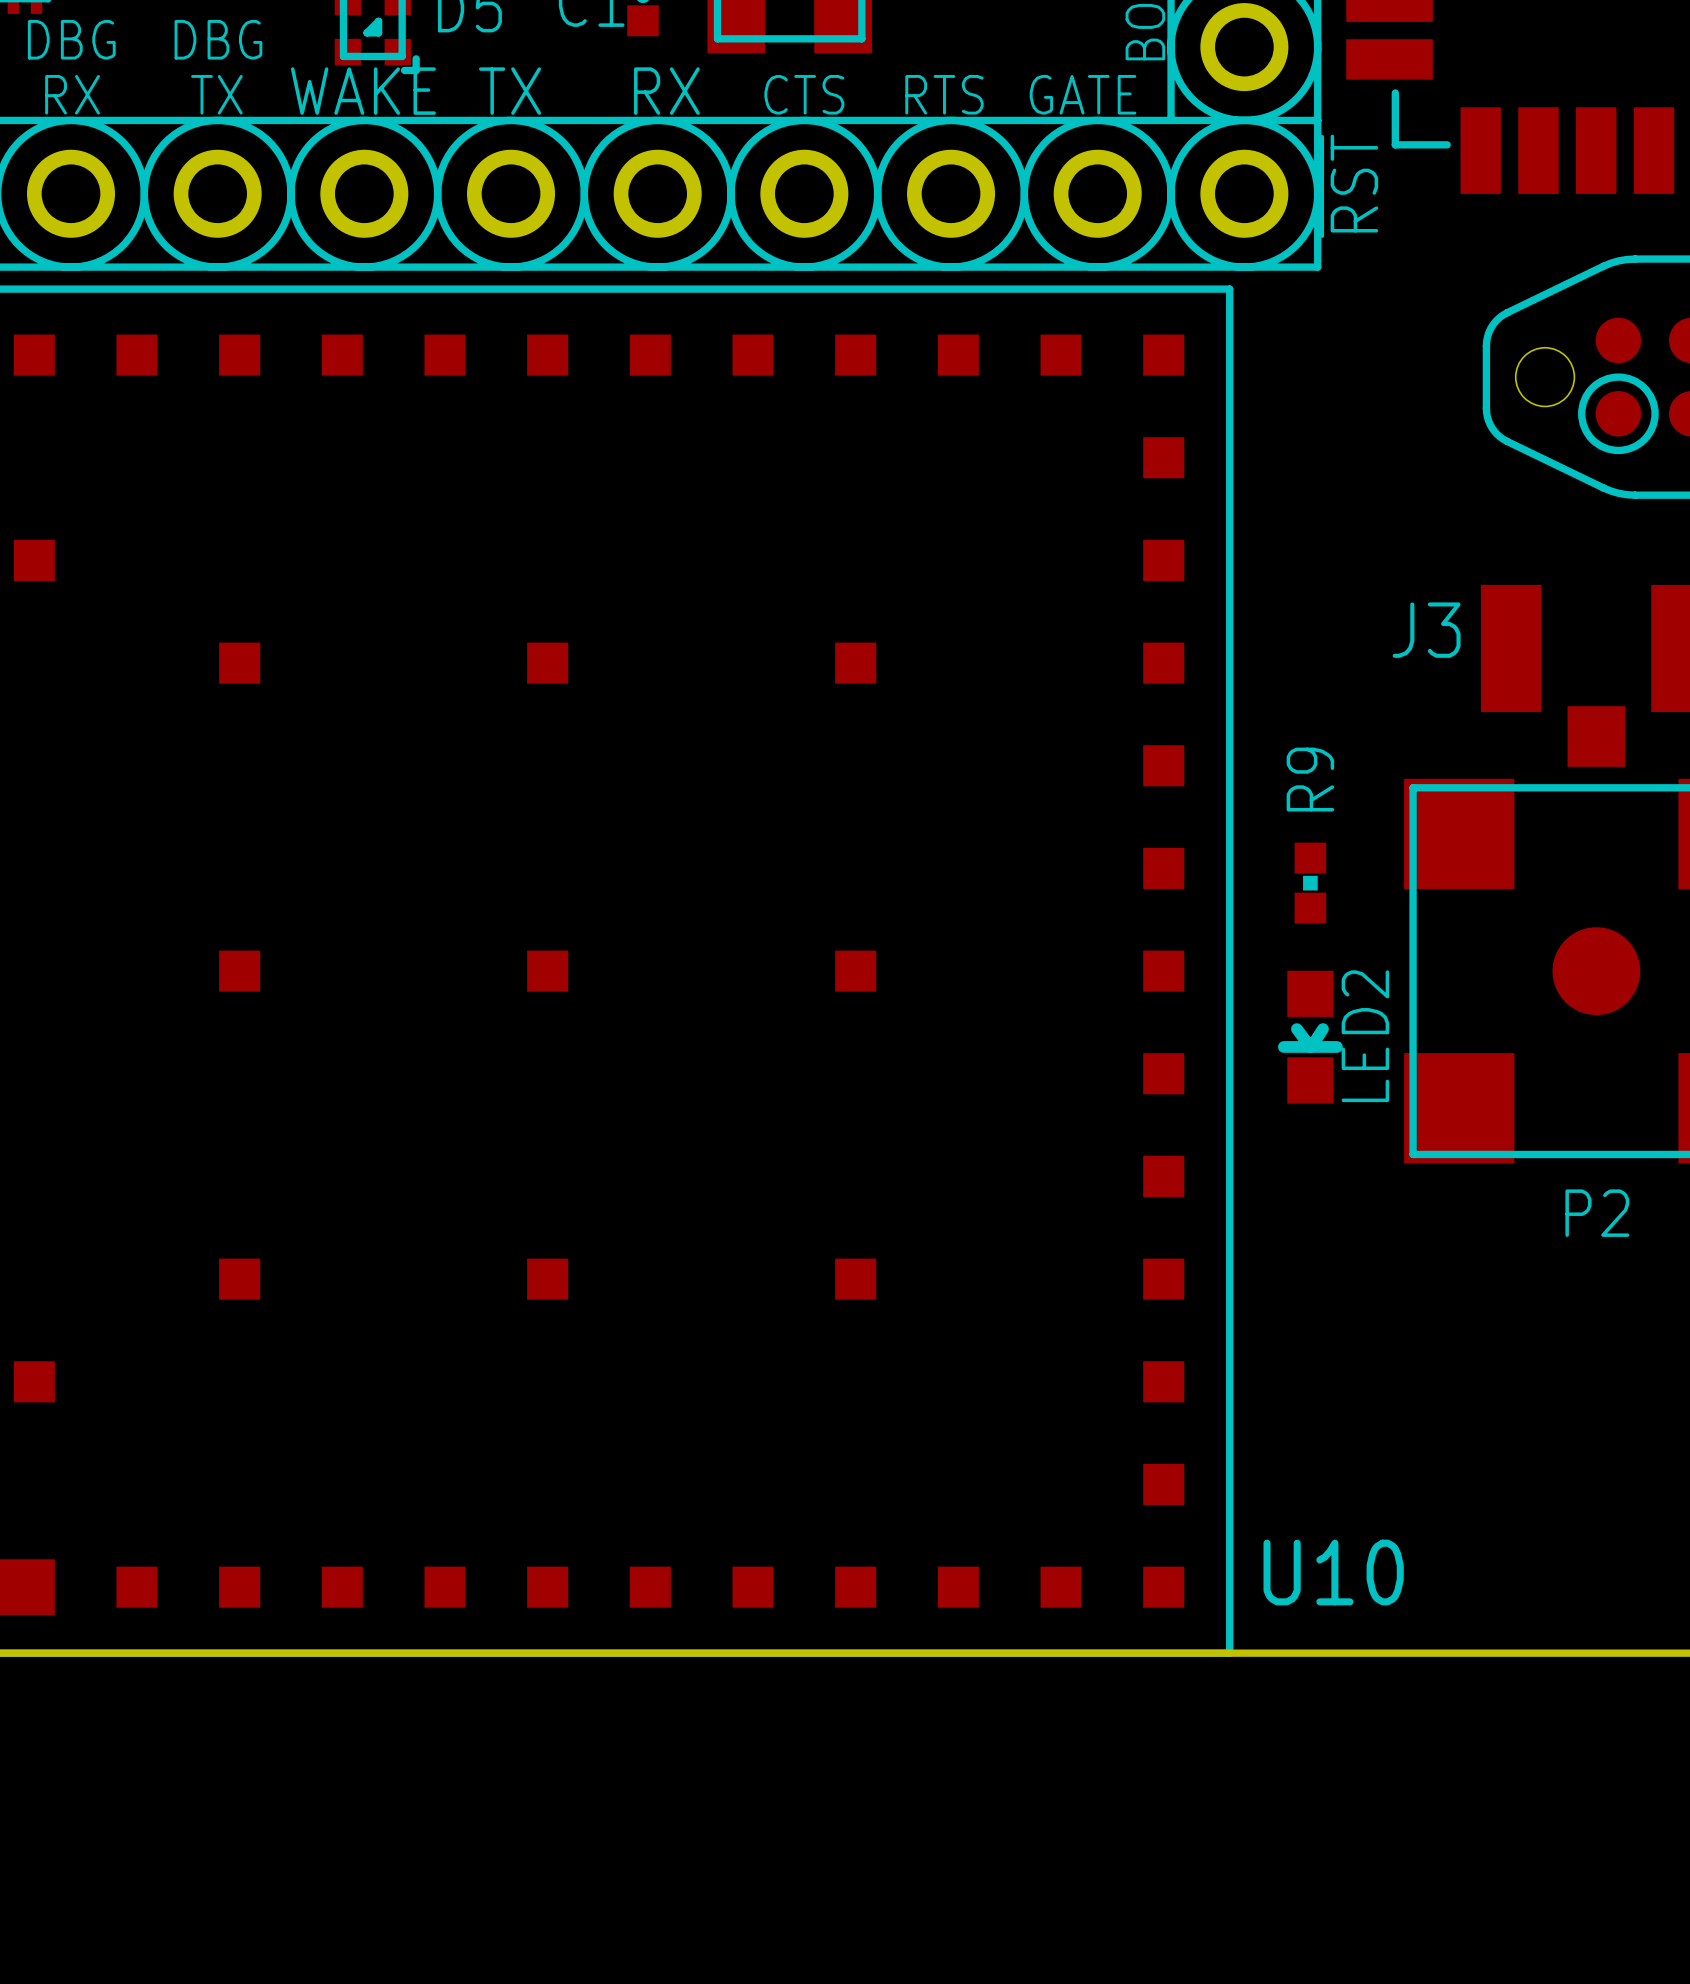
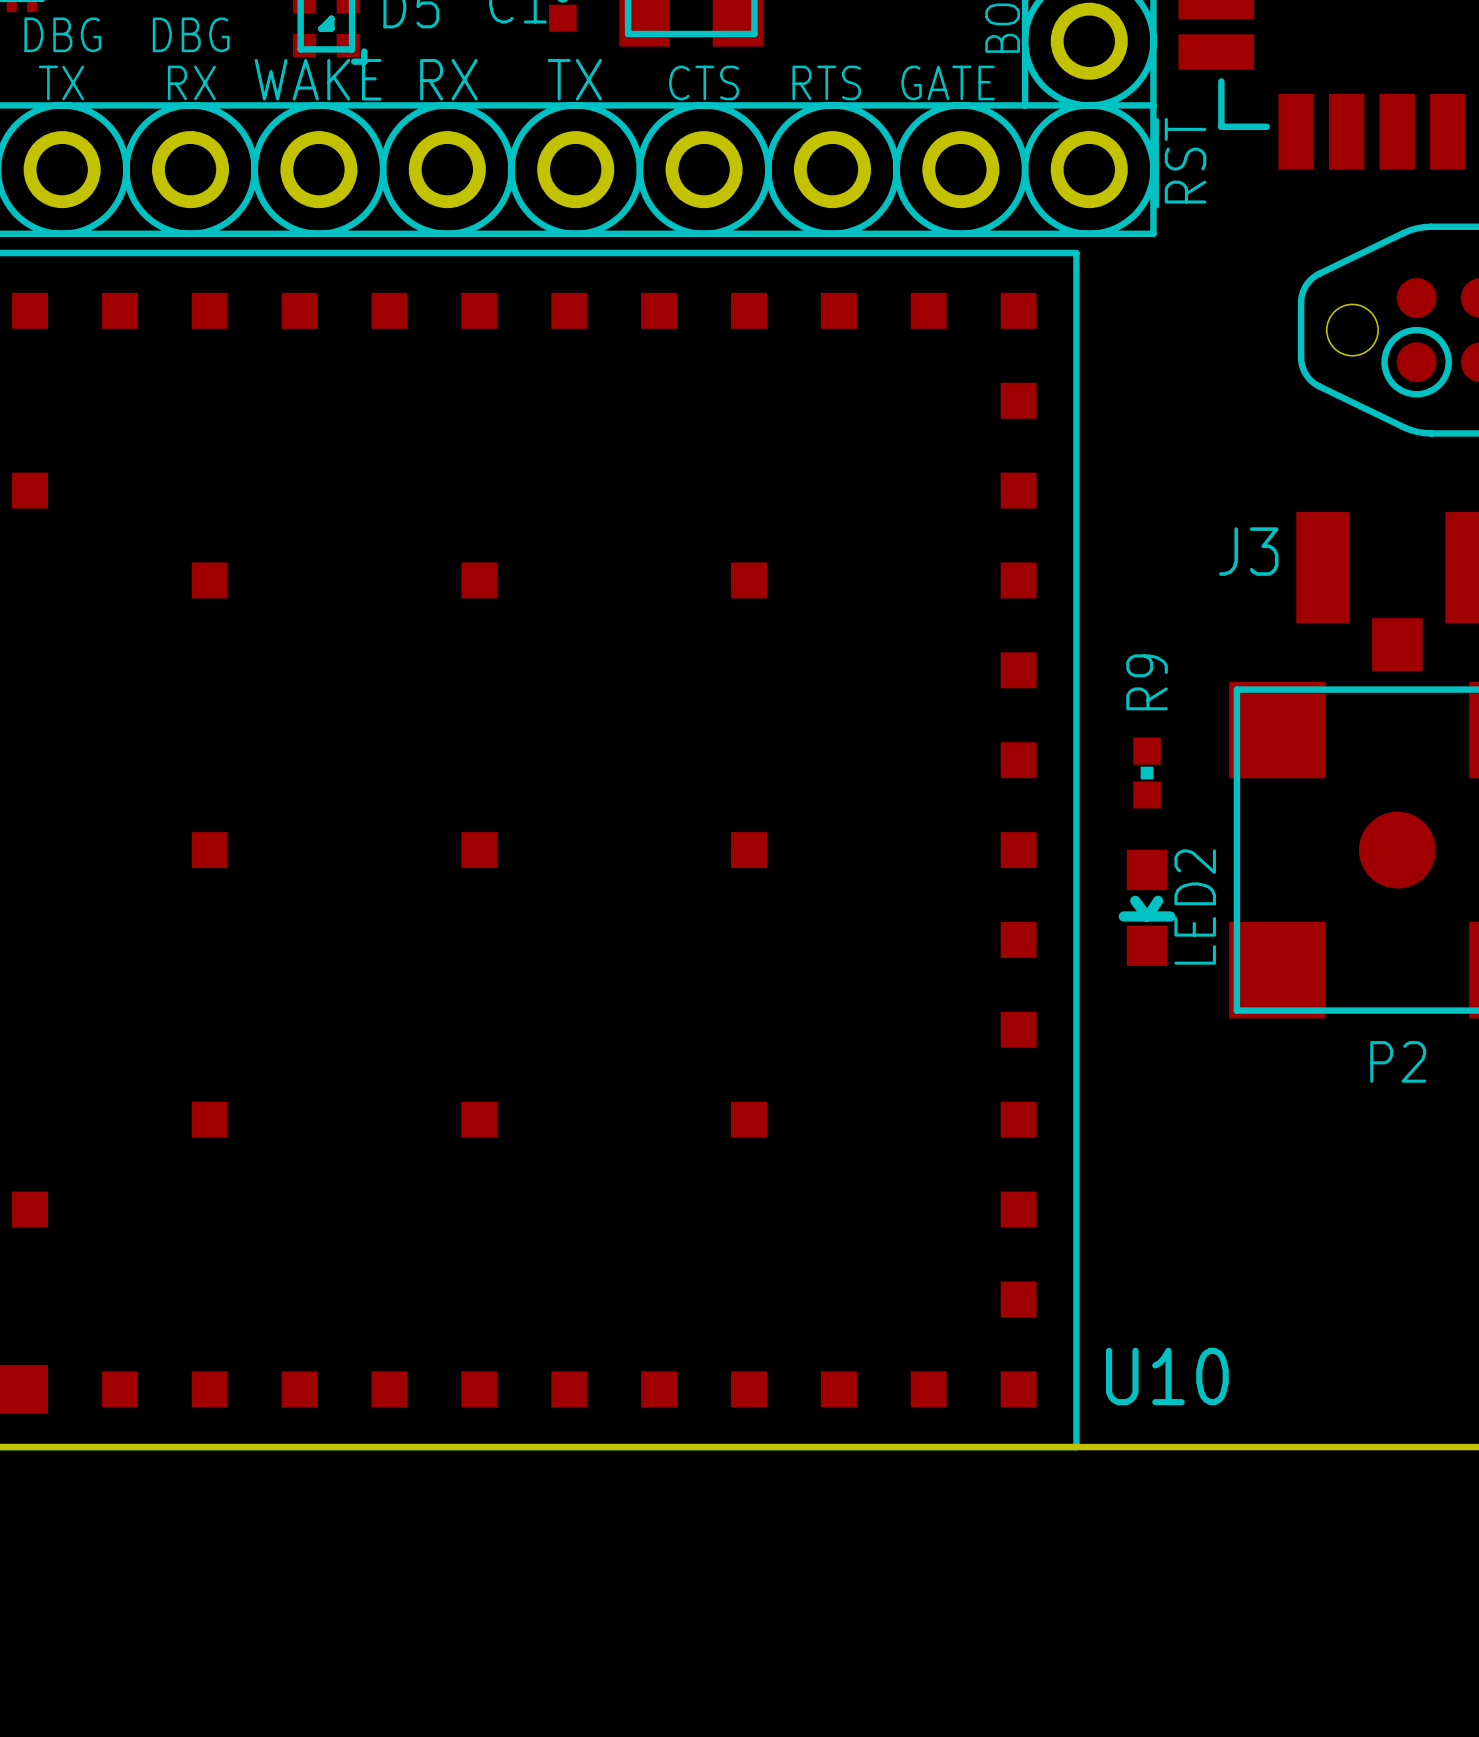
text: TX (510, 91) -> RX (448, 79)
text: RX (666, 91) -> TX (574, 79)
text: RX (72, 94) -> TX (61, 82)
text: TX (216, 94) -> RX (191, 82)

